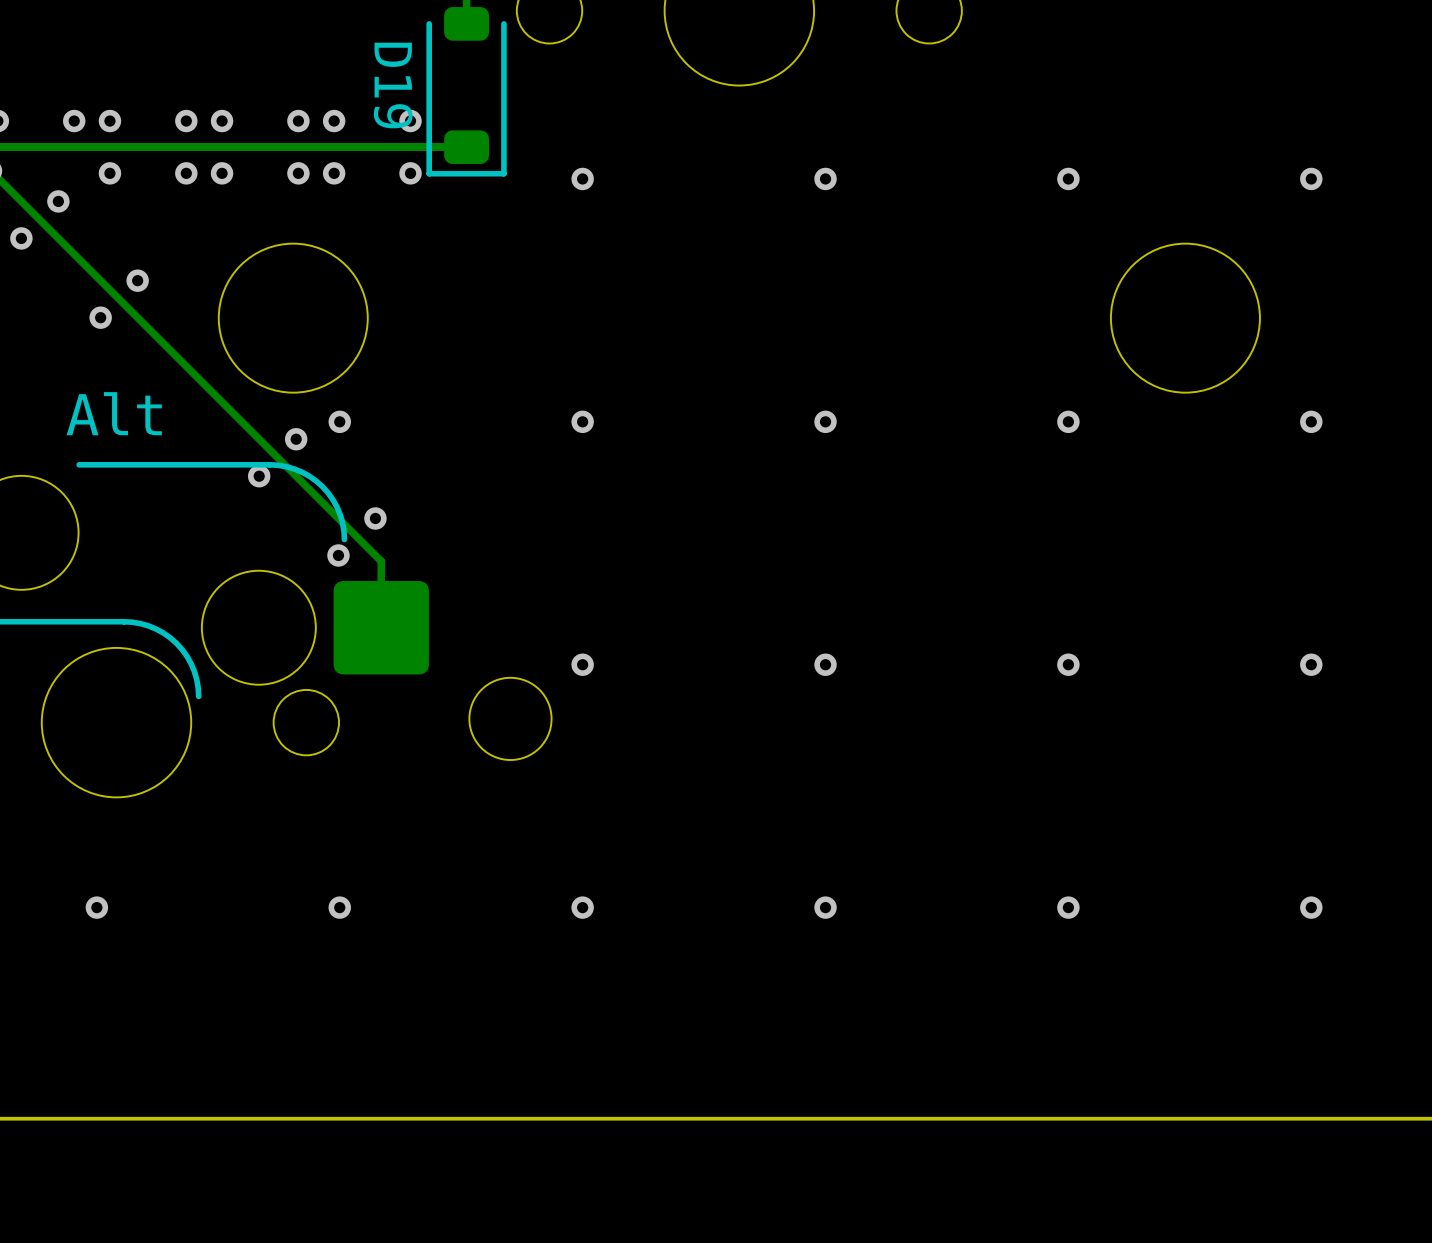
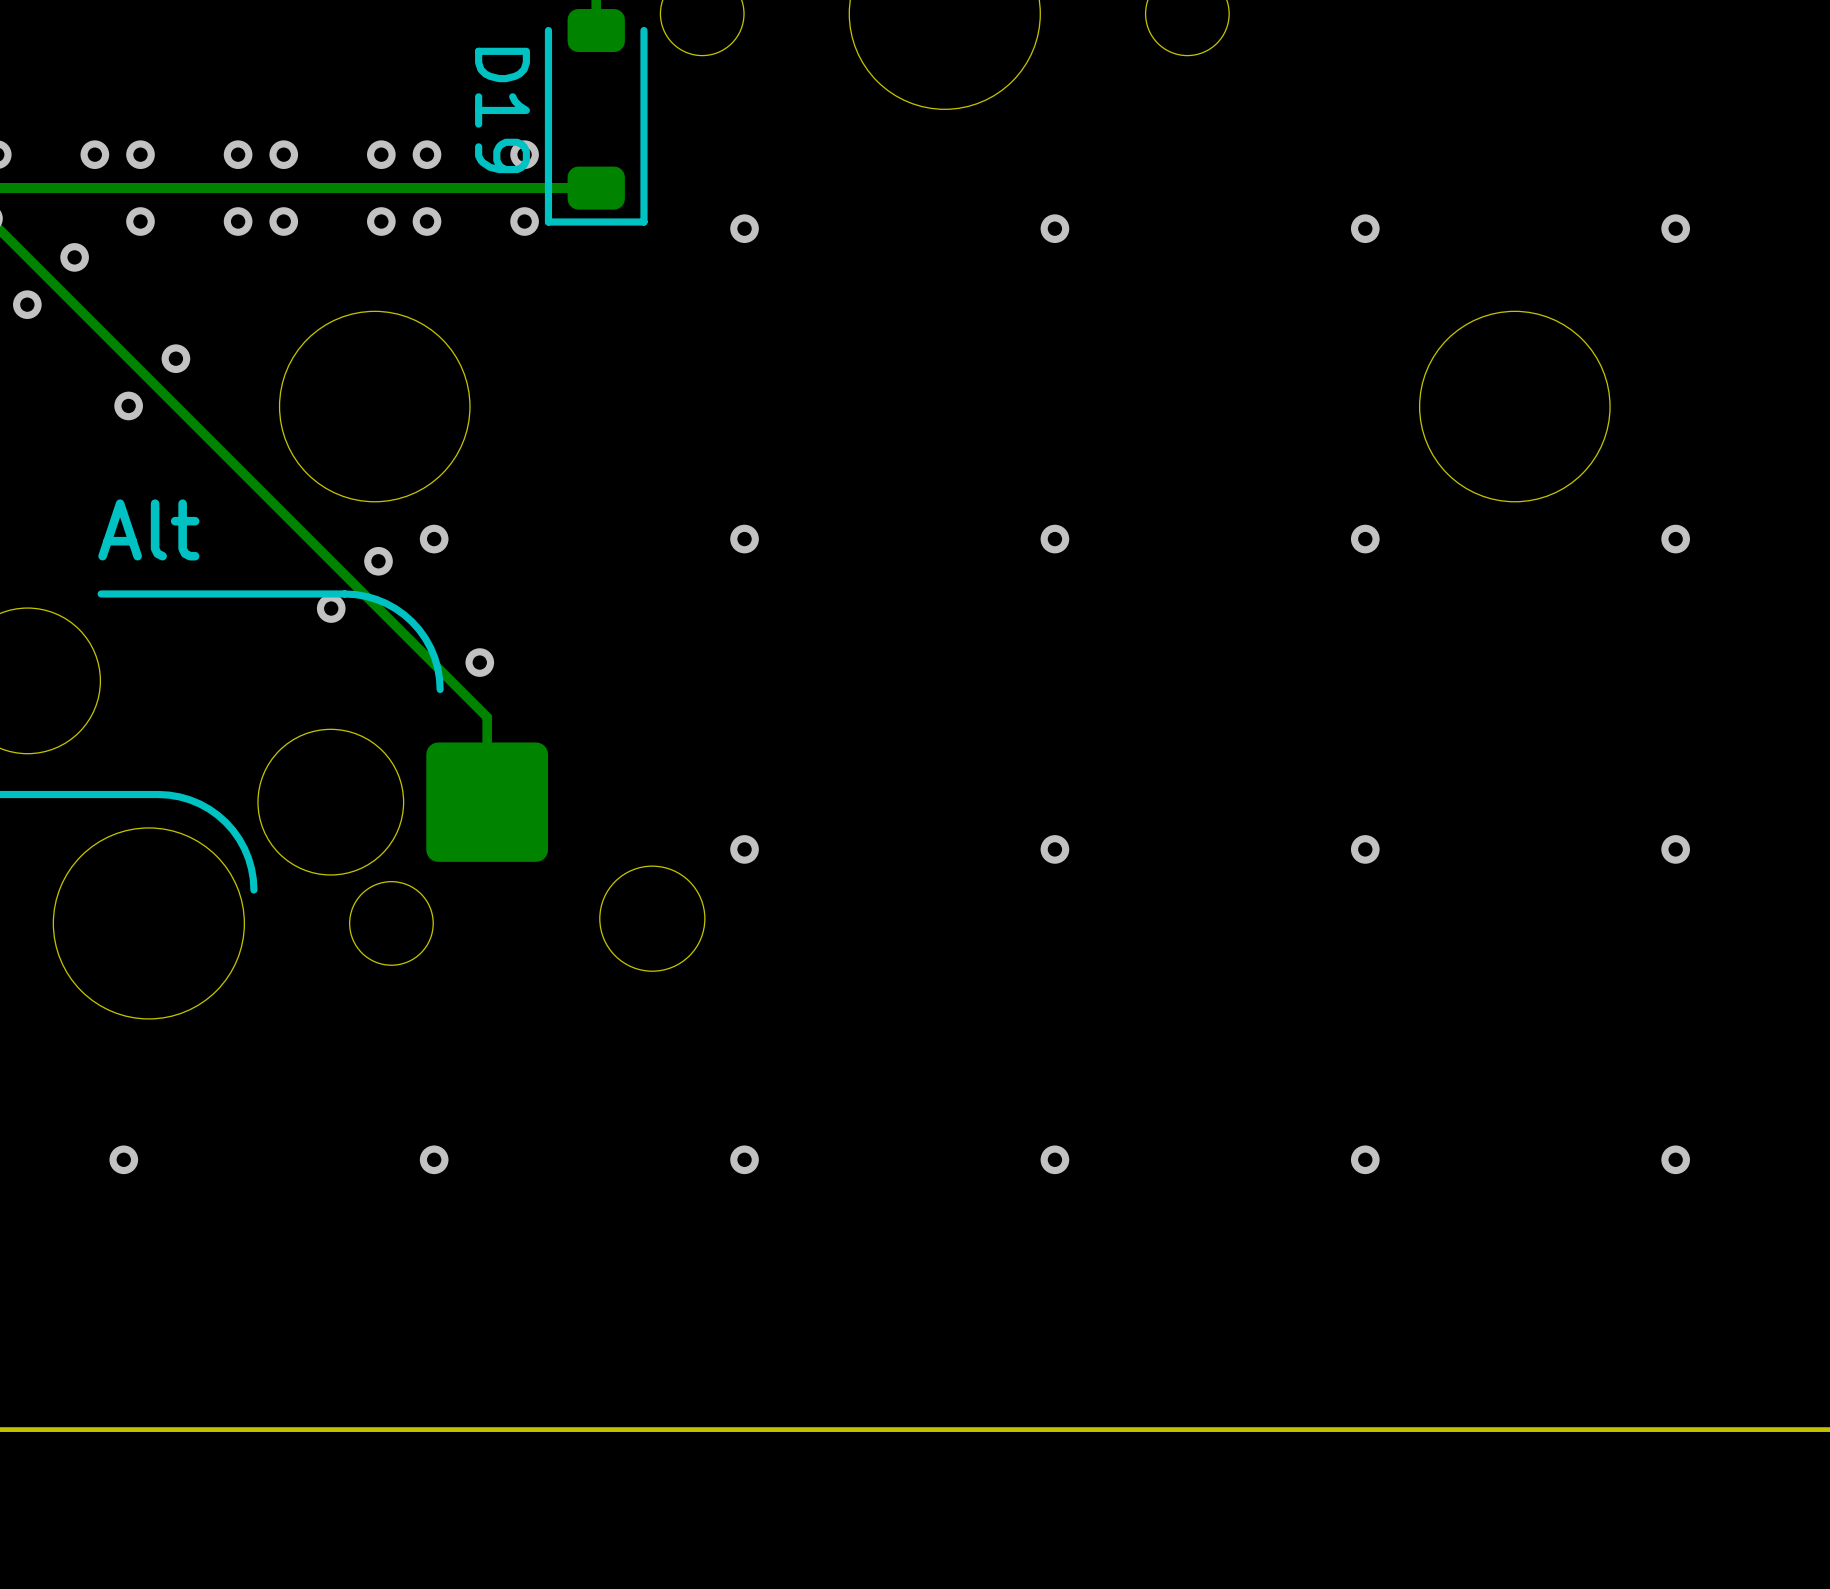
via: (338, 555) -> none

